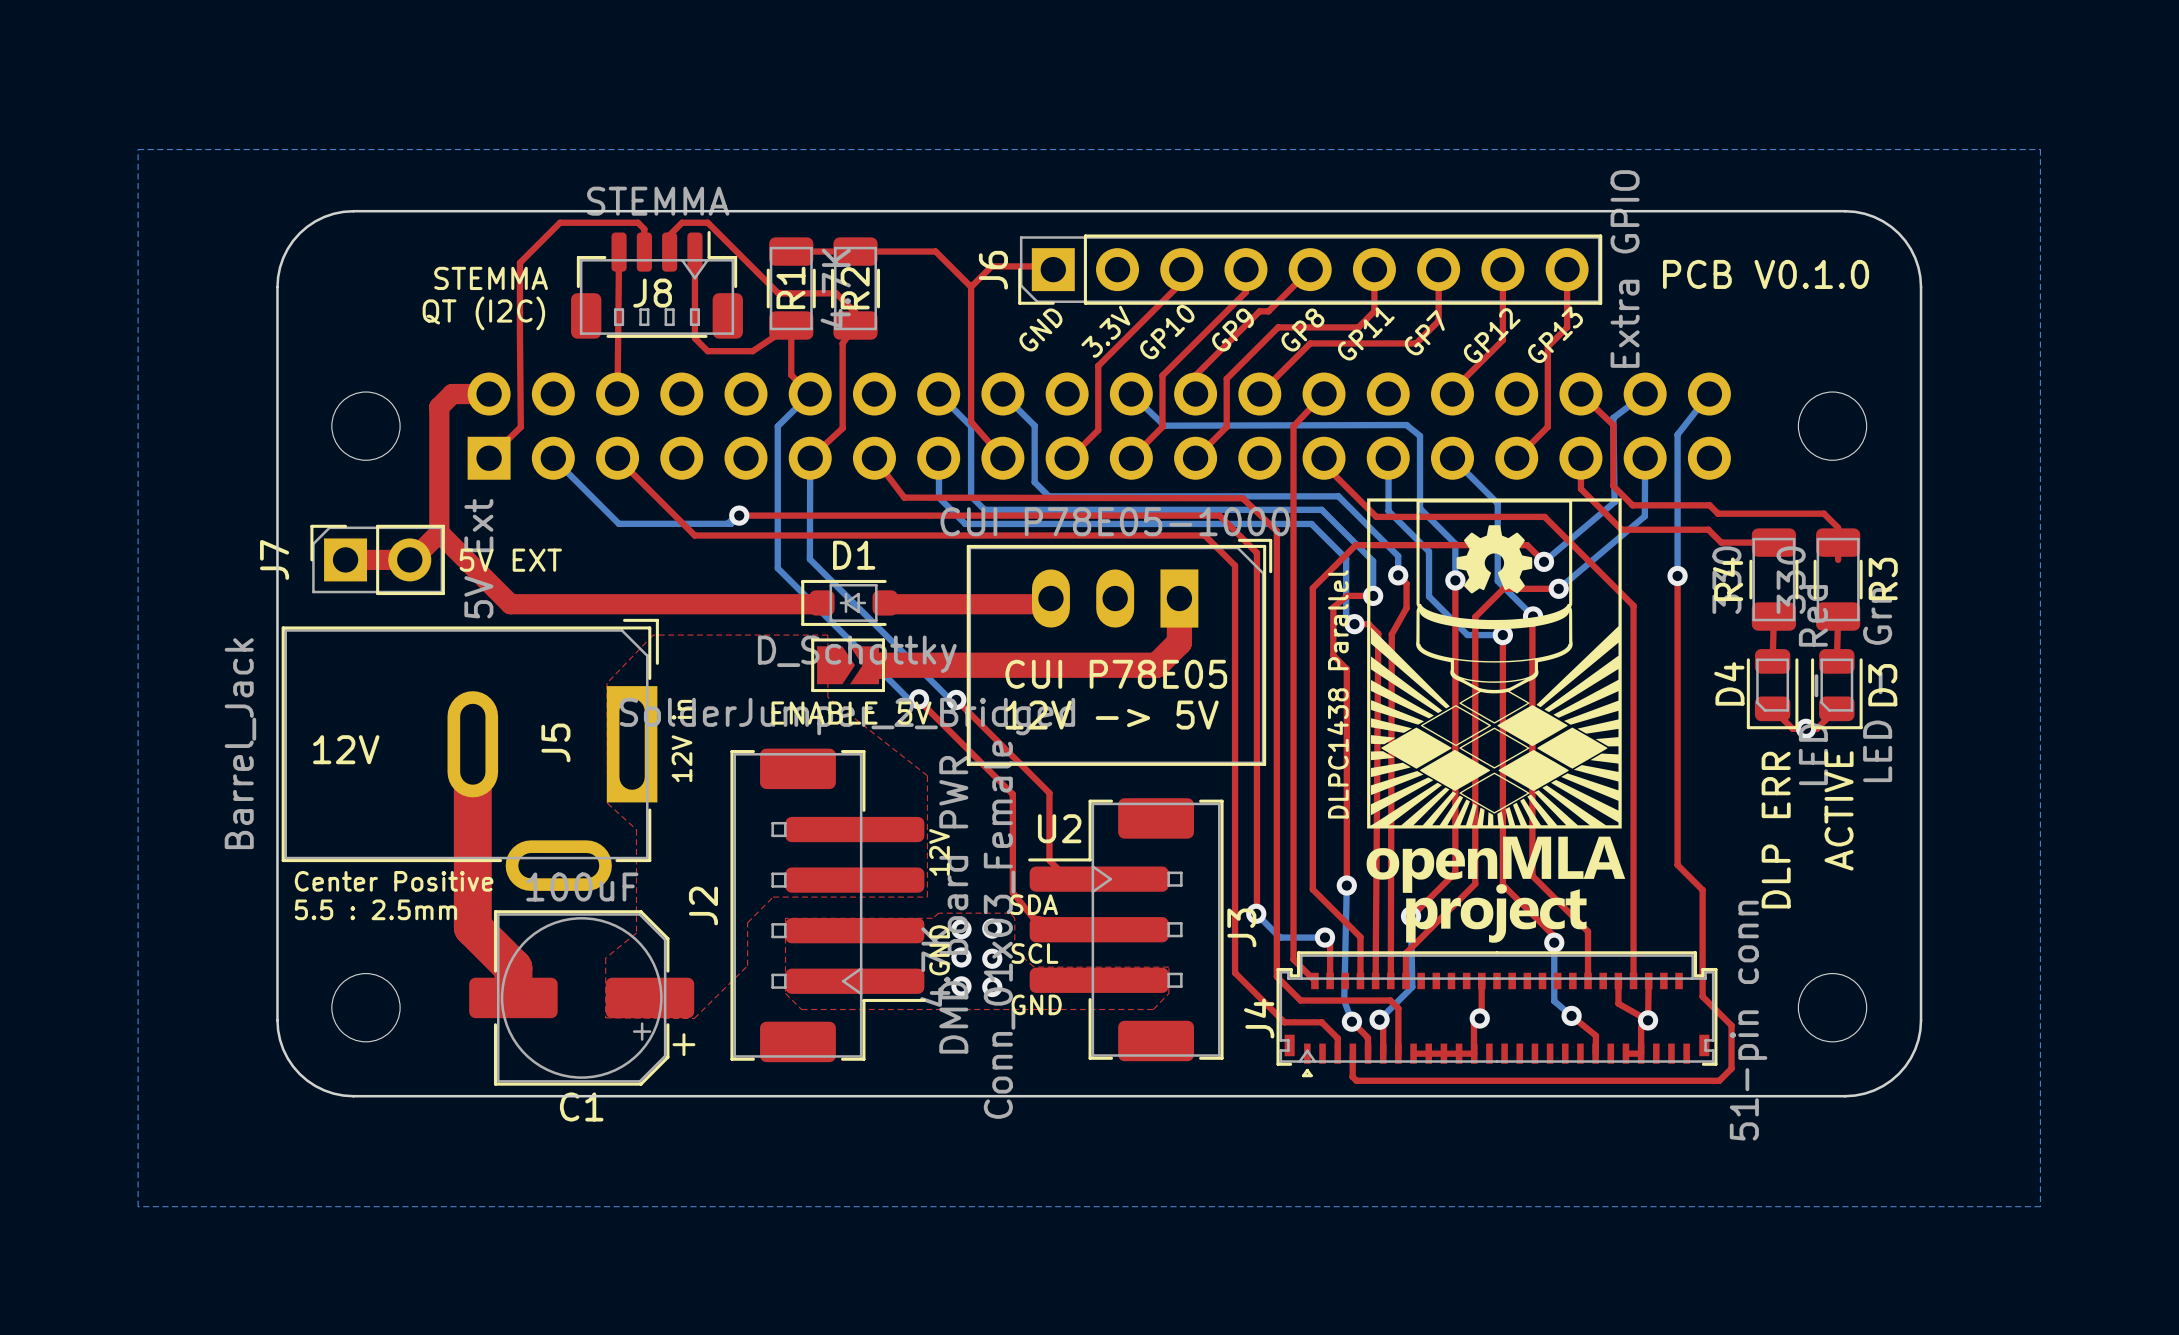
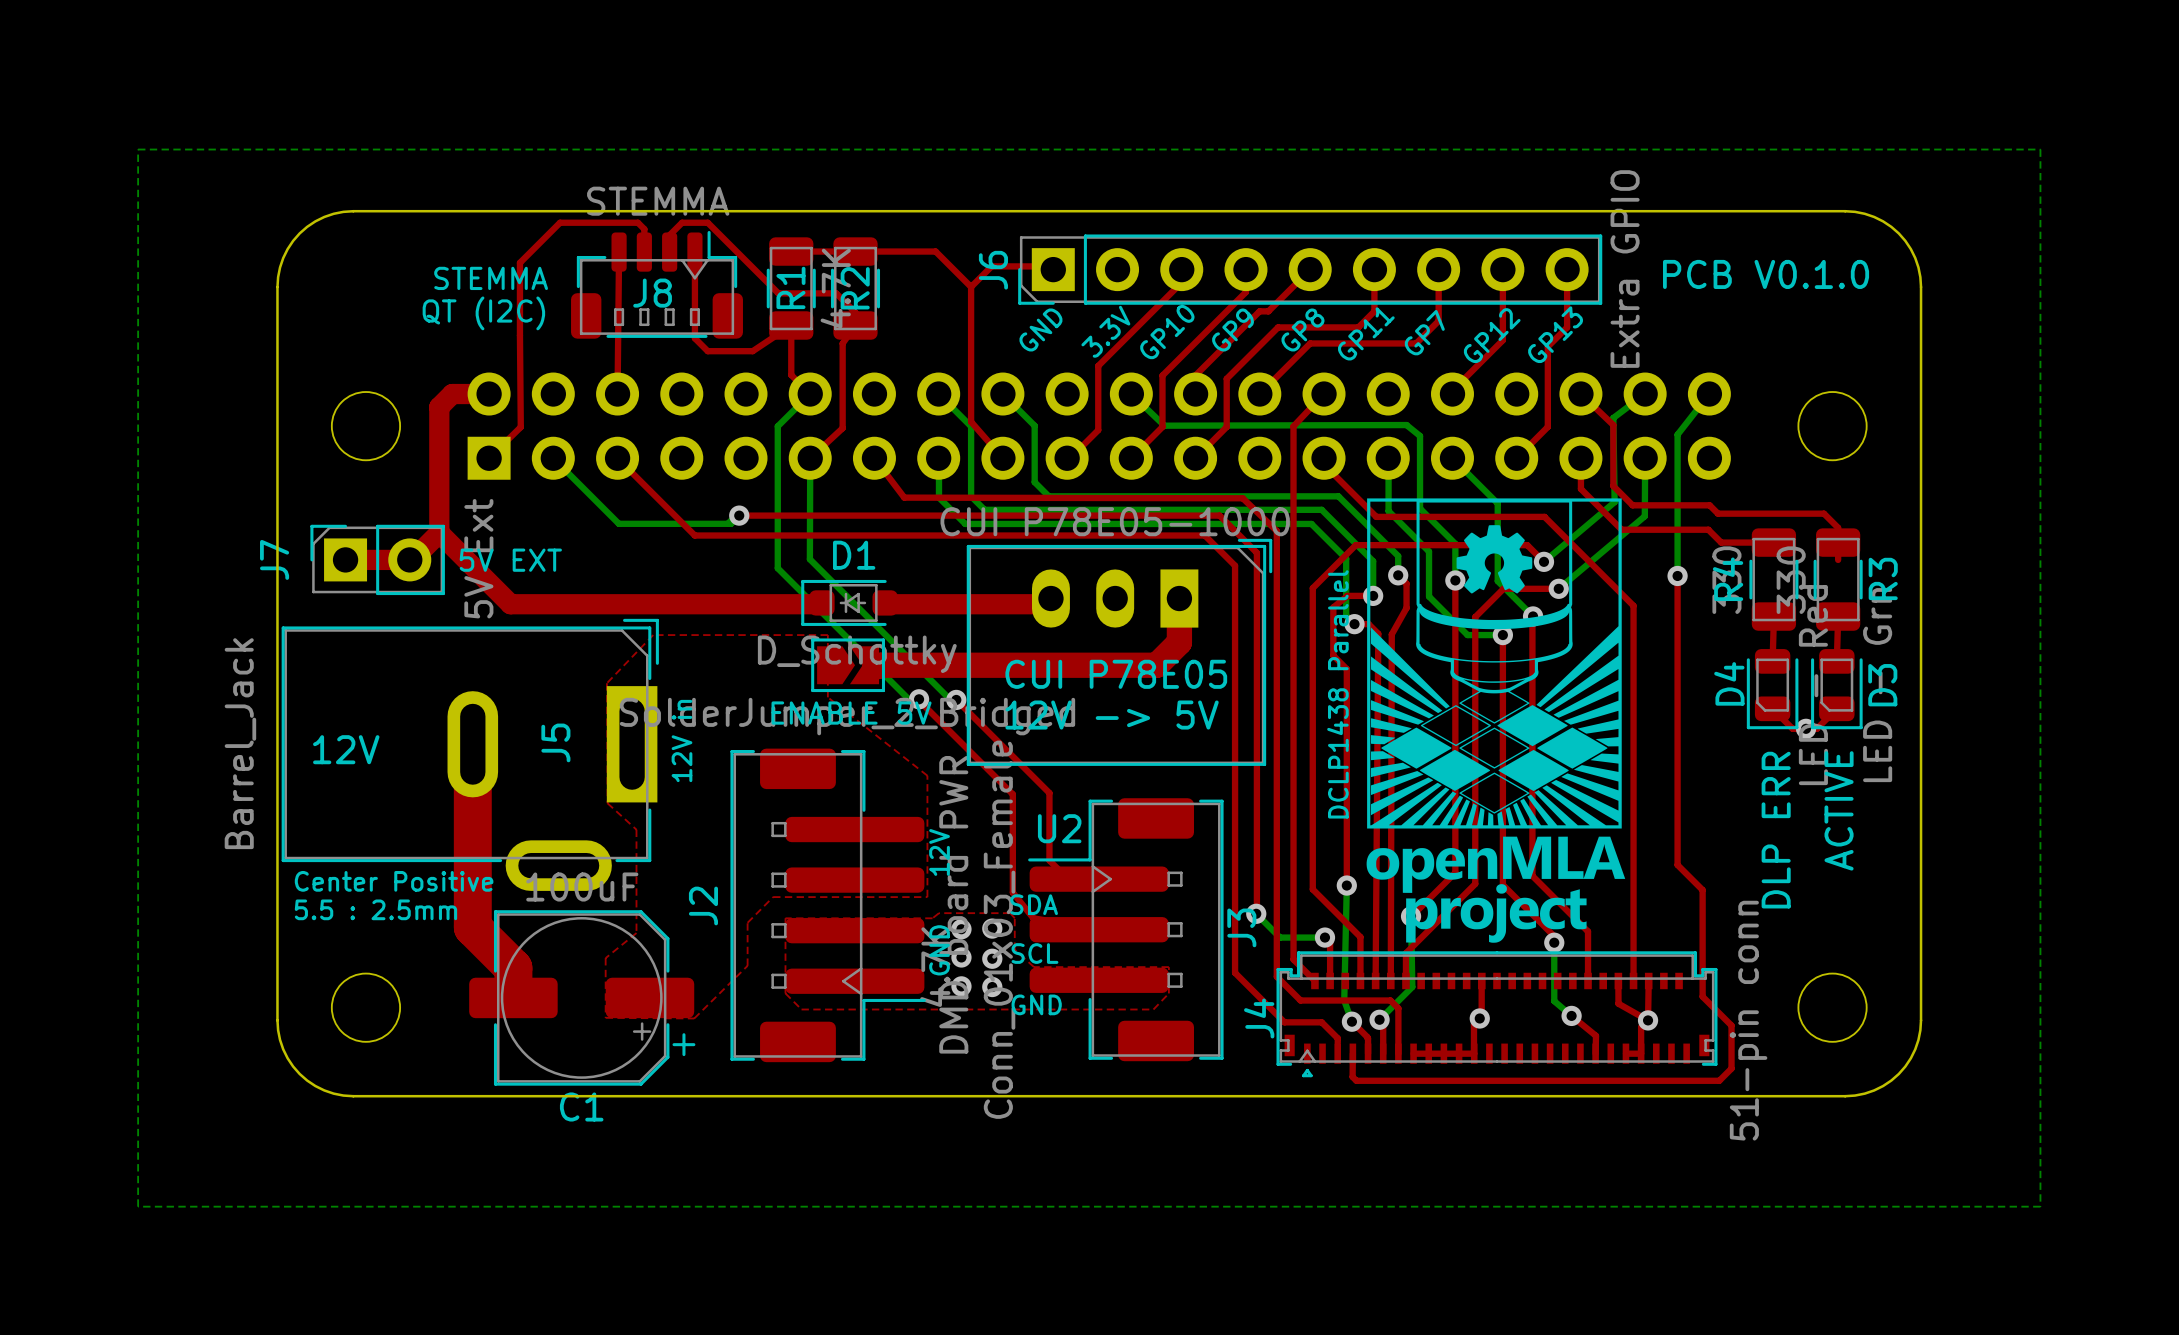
text: DLPC1438 Parallel (1337, 694) -> DCLP1438 Parallel (1337, 694)

